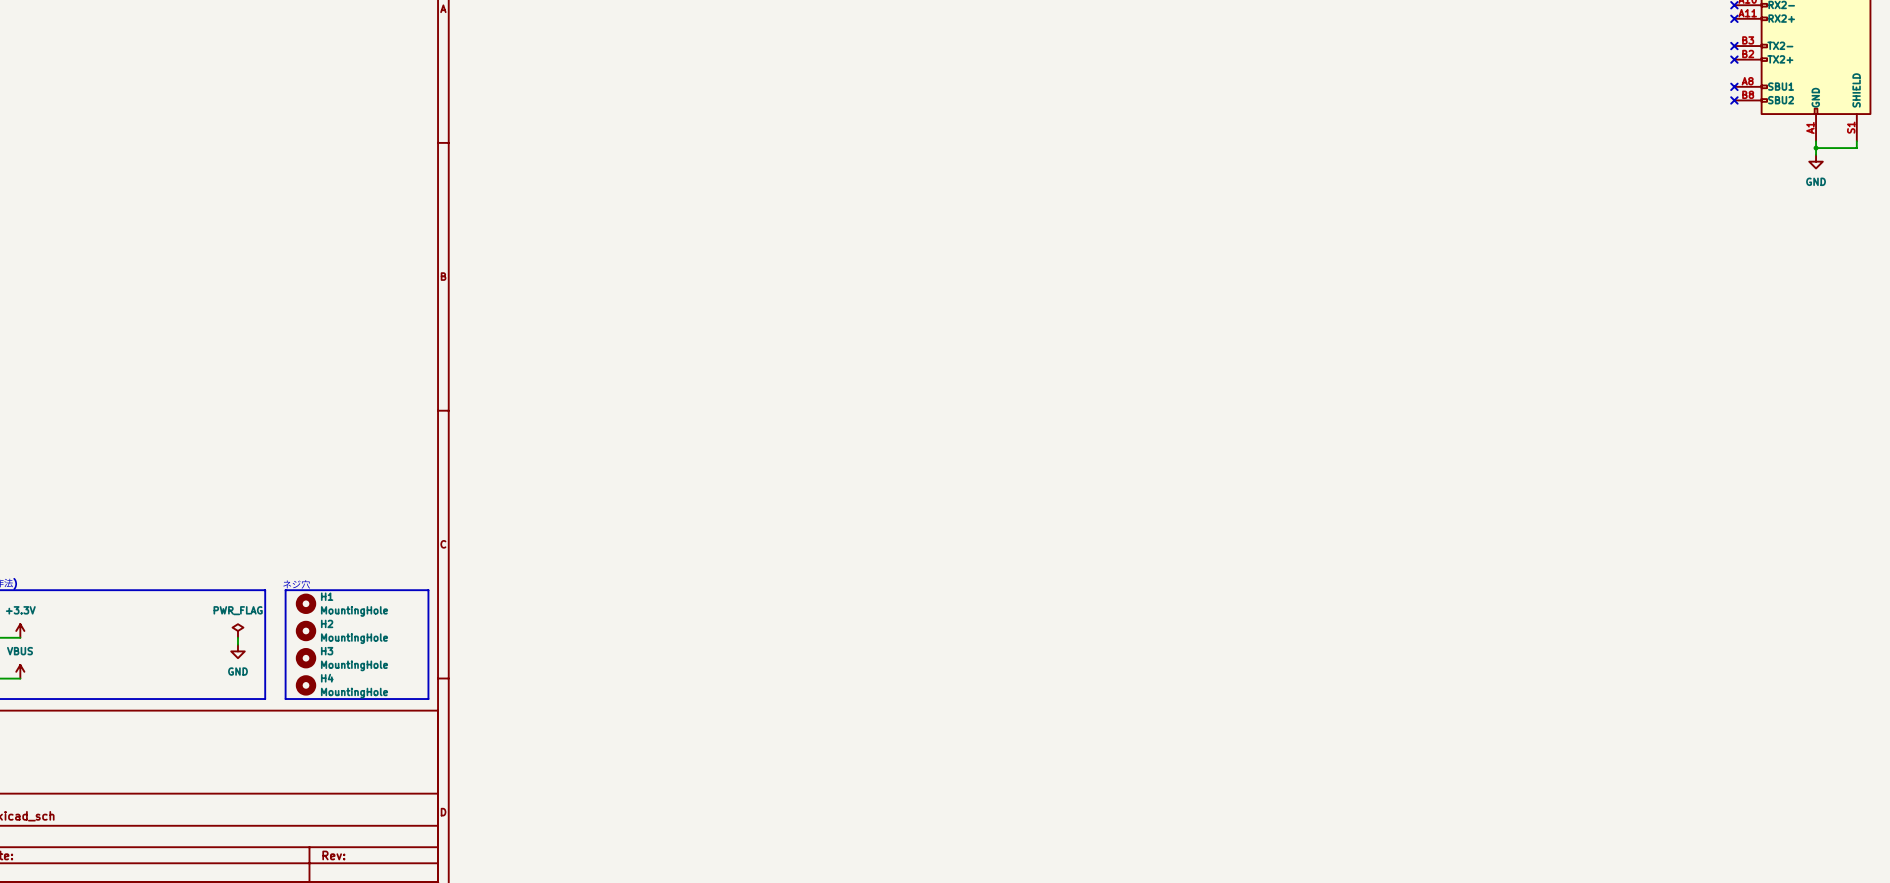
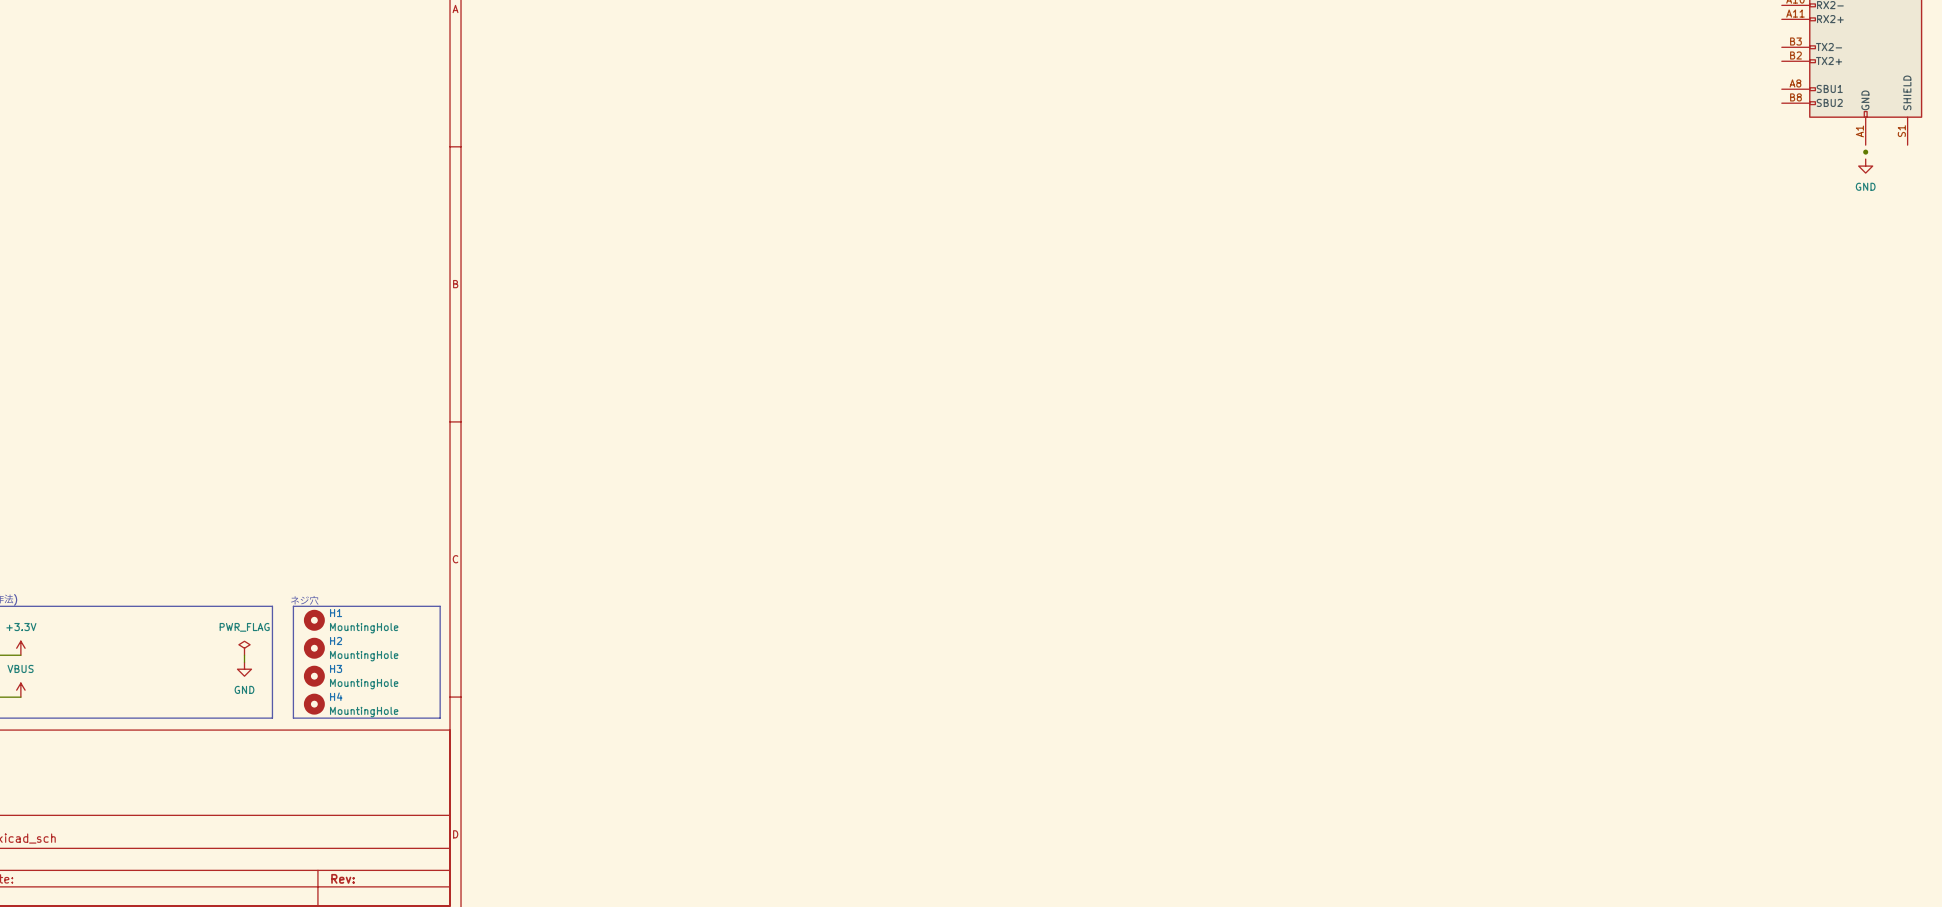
no-connect mark: (1734, 5) -> none
no-connect mark: (1734, 18) -> none
no-connect mark: (1734, 46) -> none
no-connect mark: (1734, 59) -> none
no-connect mark: (1734, 86) -> none
no-connect mark: (1734, 100) -> none
wire: (1816, 141) (1816, 154) -> none
wire: (1856, 141) (1856, 148) (1816, 148) -> none

